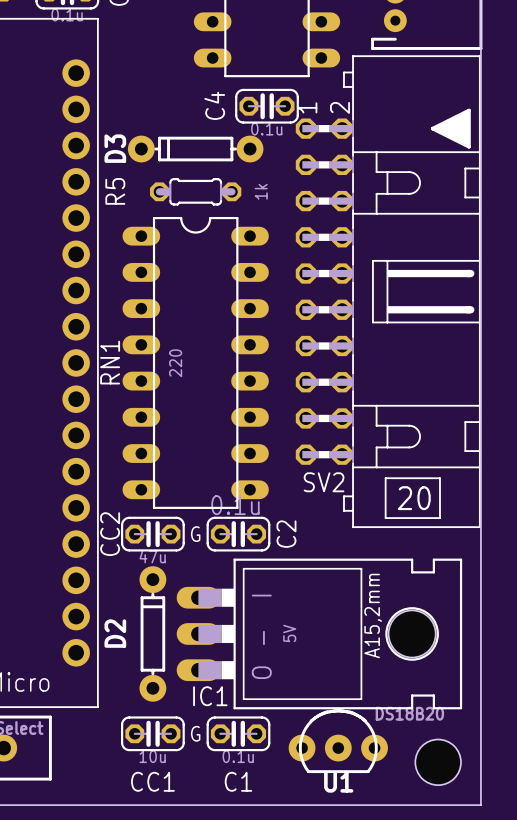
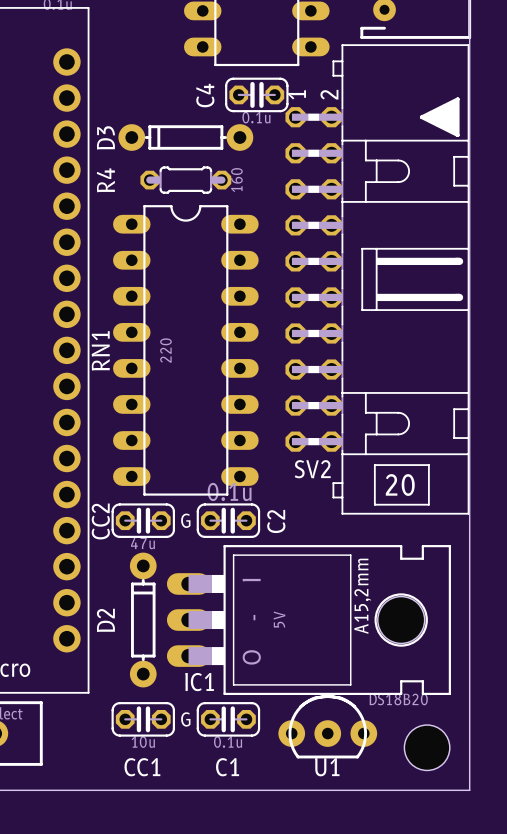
R5 name: R5 (115, 191) -> R4 (105, 180)
R5 value: 1k (261, 191) -> 160 (236, 180)

